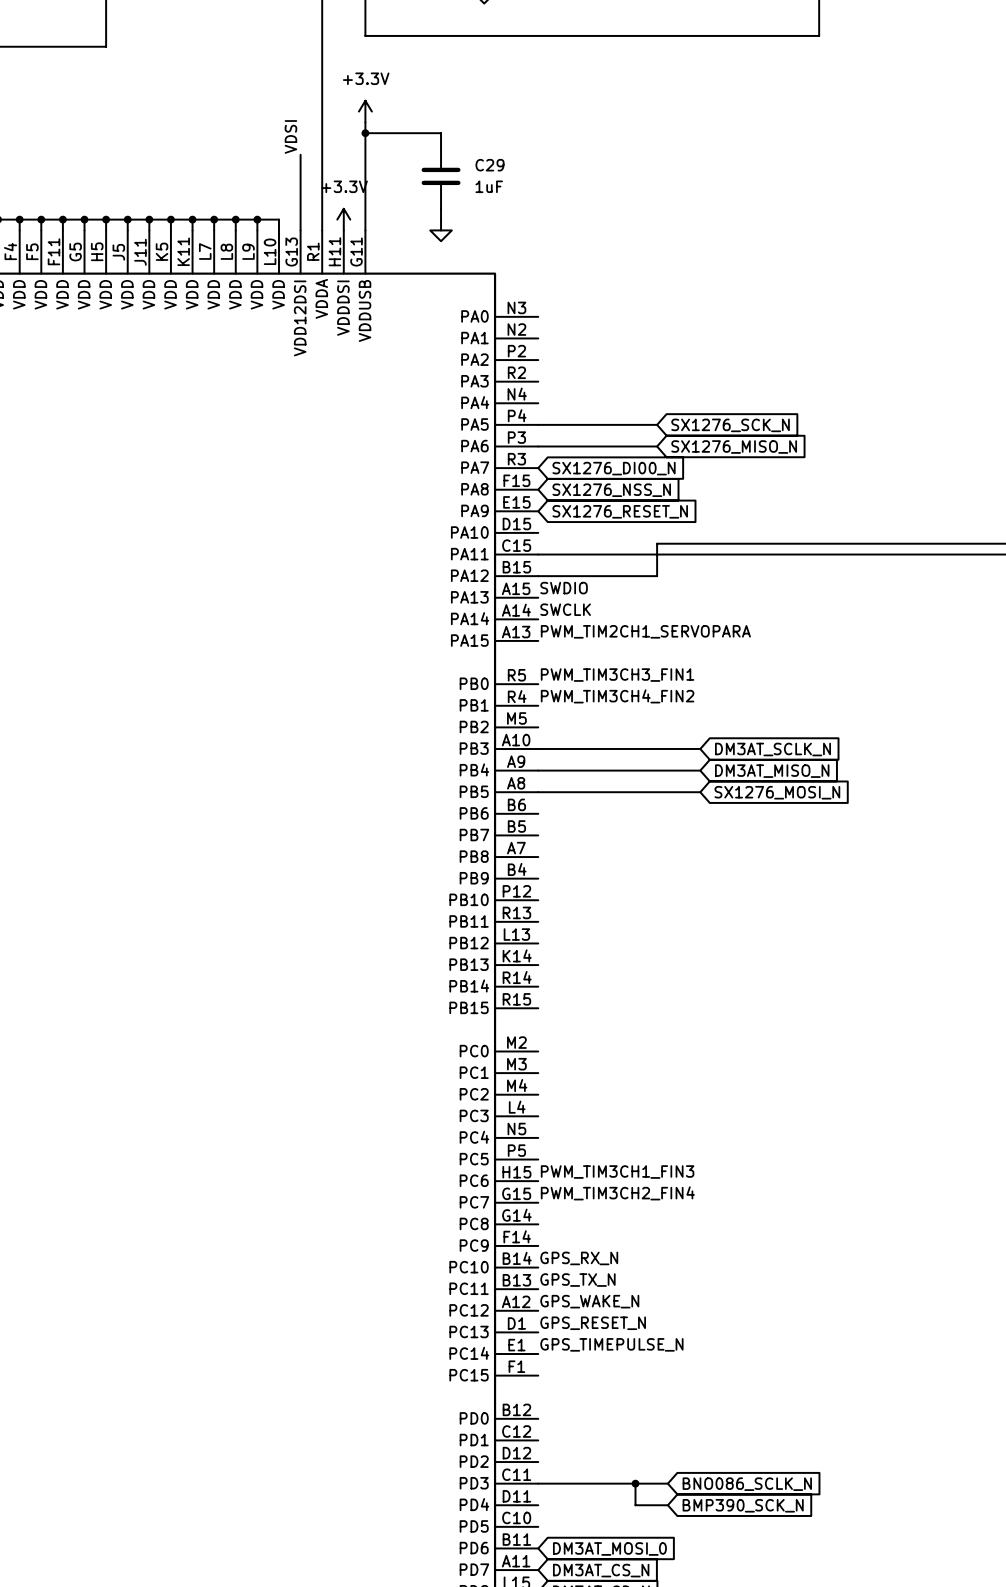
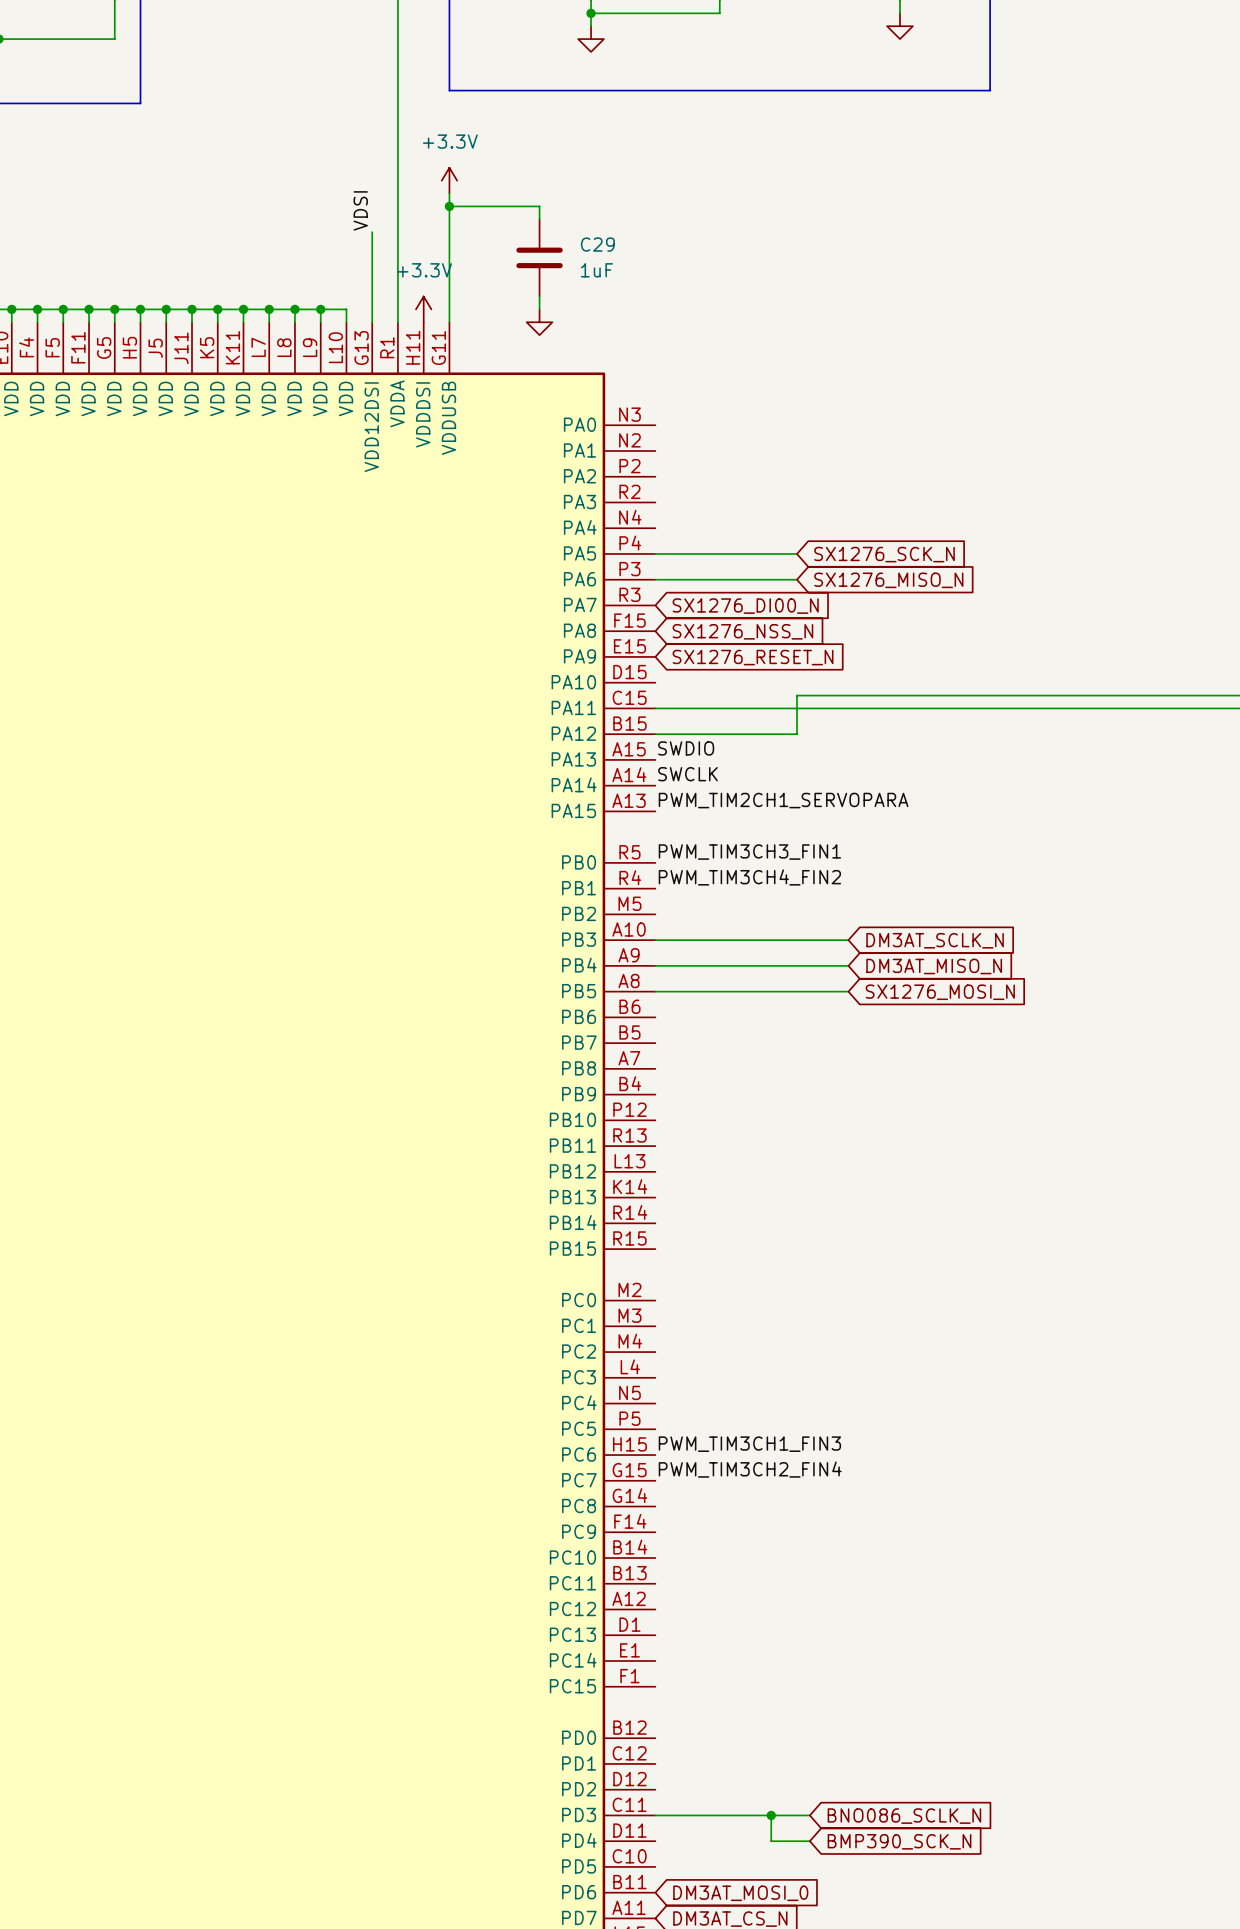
label: GPS_RX_N (579, 1258) -> none
label: GPS_TX_N (577, 1280) -> none
label: GPS_WAKE_N (589, 1301) -> none
label: GPS_RESET_N (593, 1323) -> none
label: GPS_TIMEPULSE_N (611, 1344) -> none

